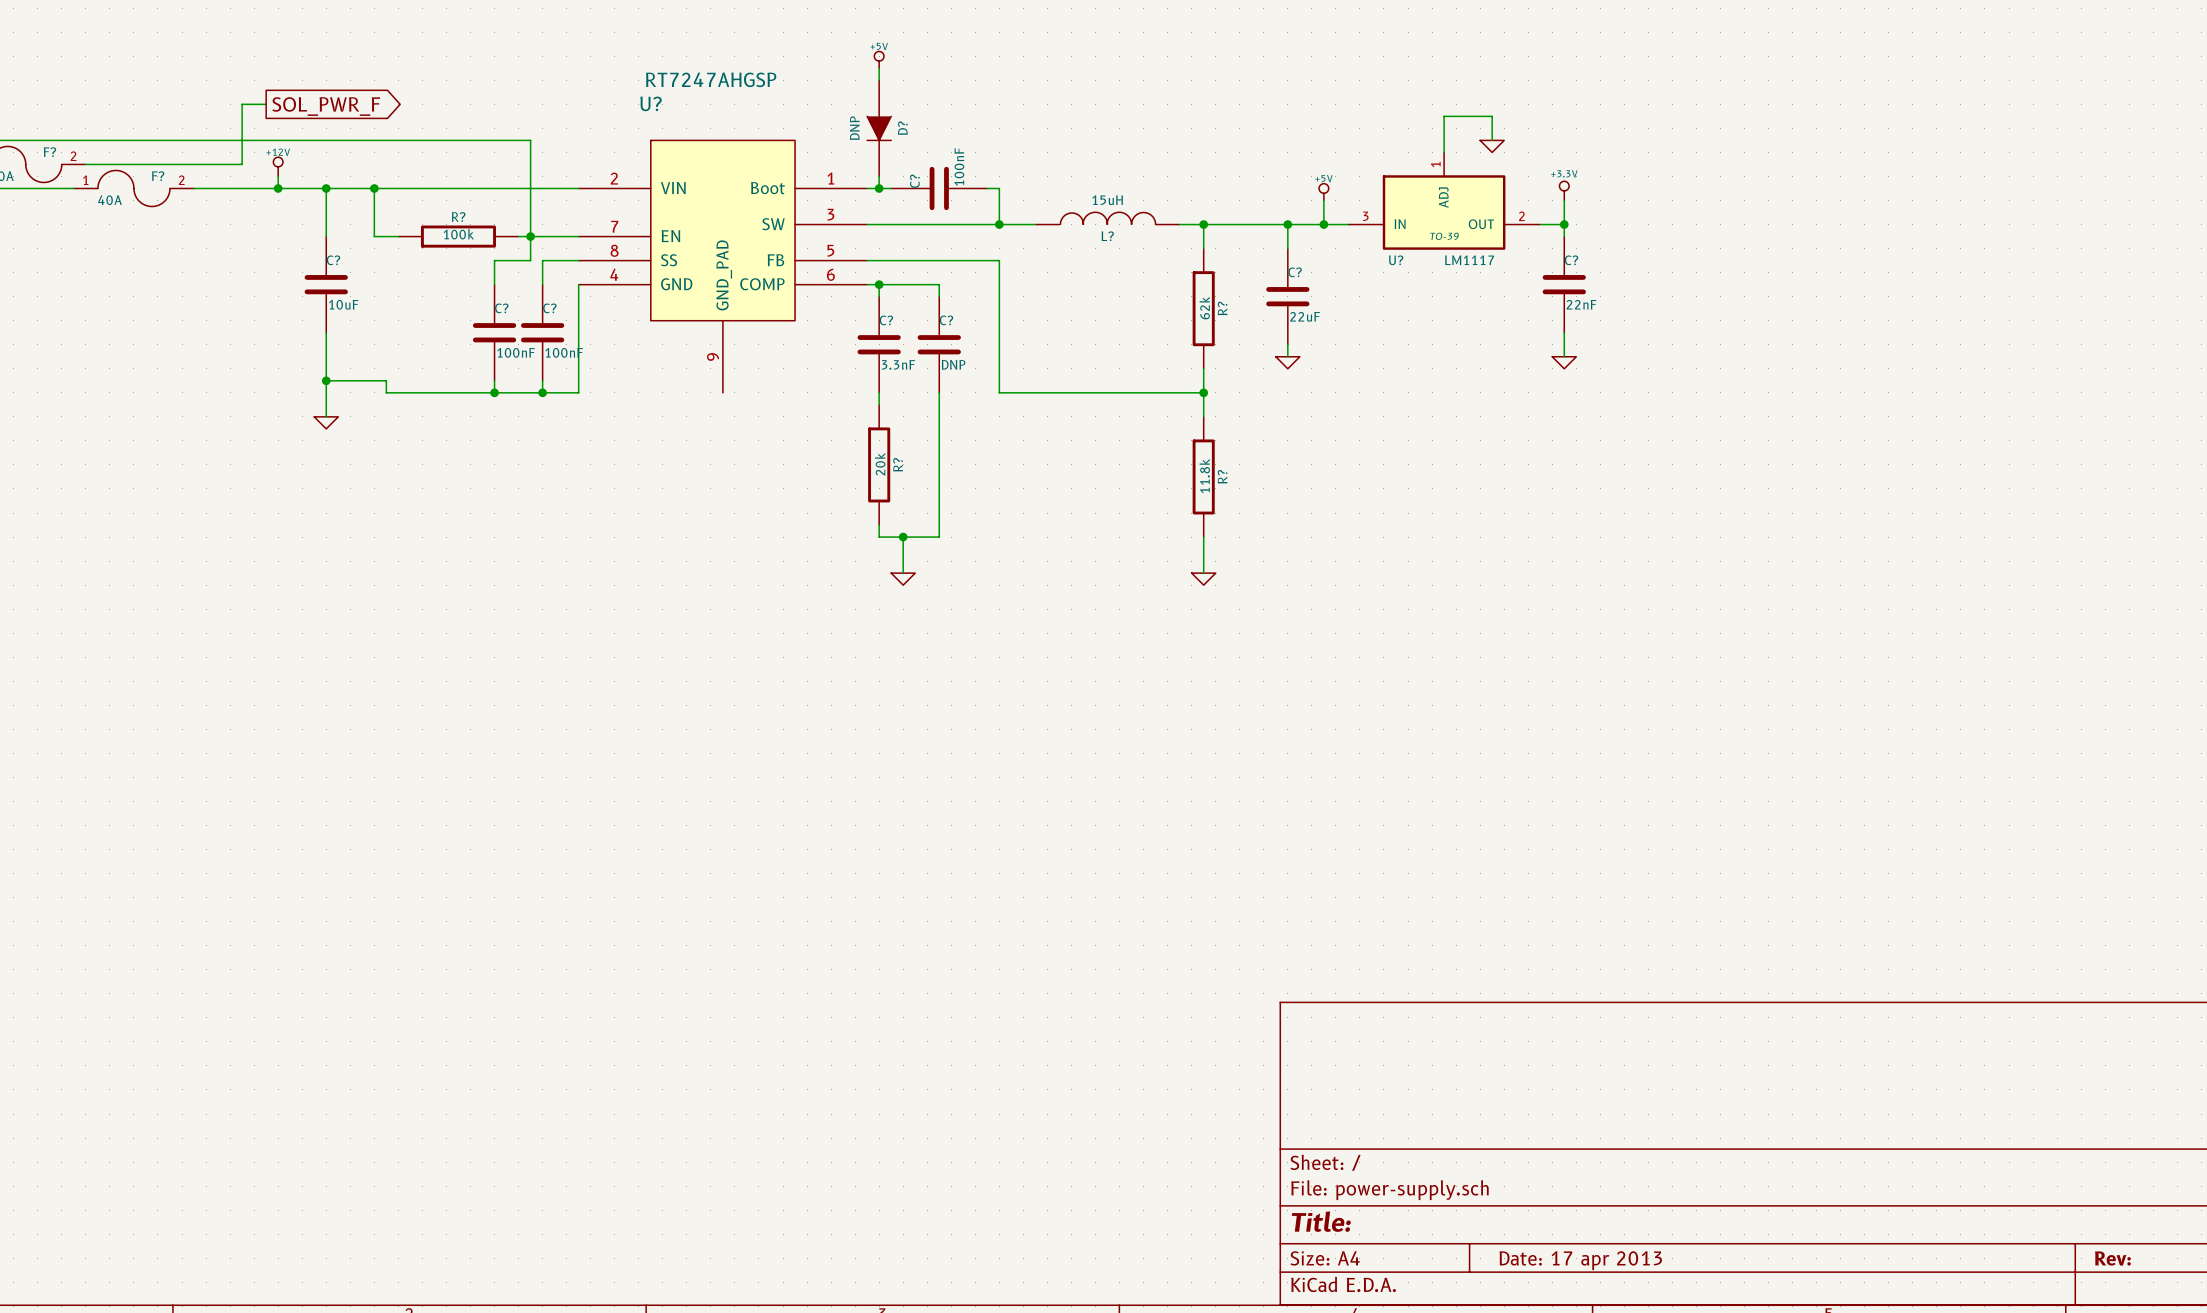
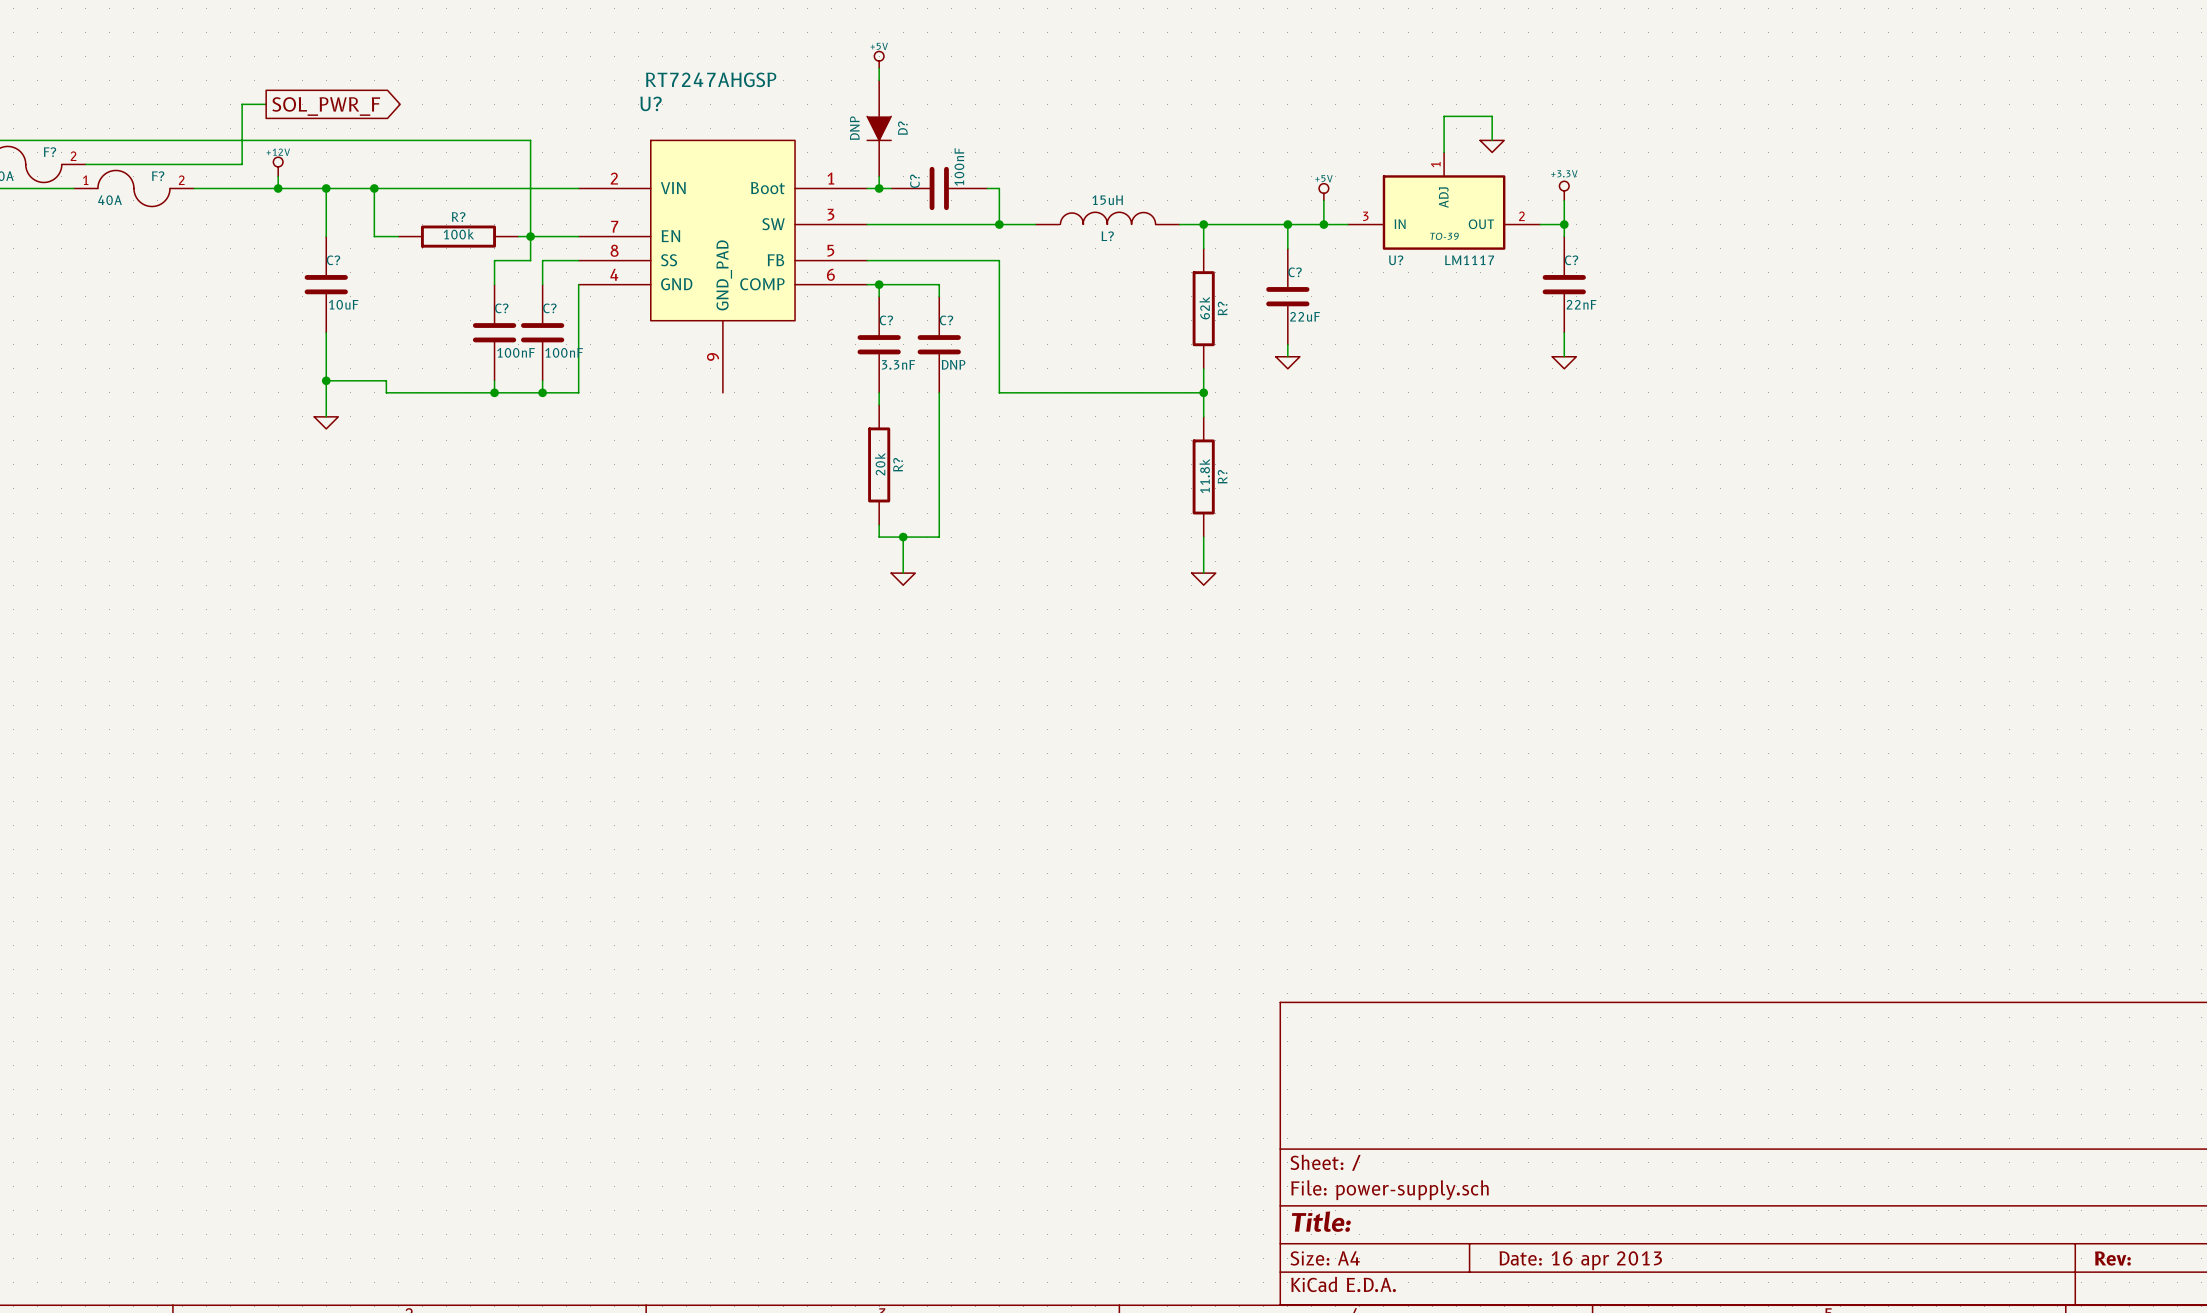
title block: Date: 17 apr 2013 (1580, 1260) -> Date: 16 apr 2013 (1580, 1260)

